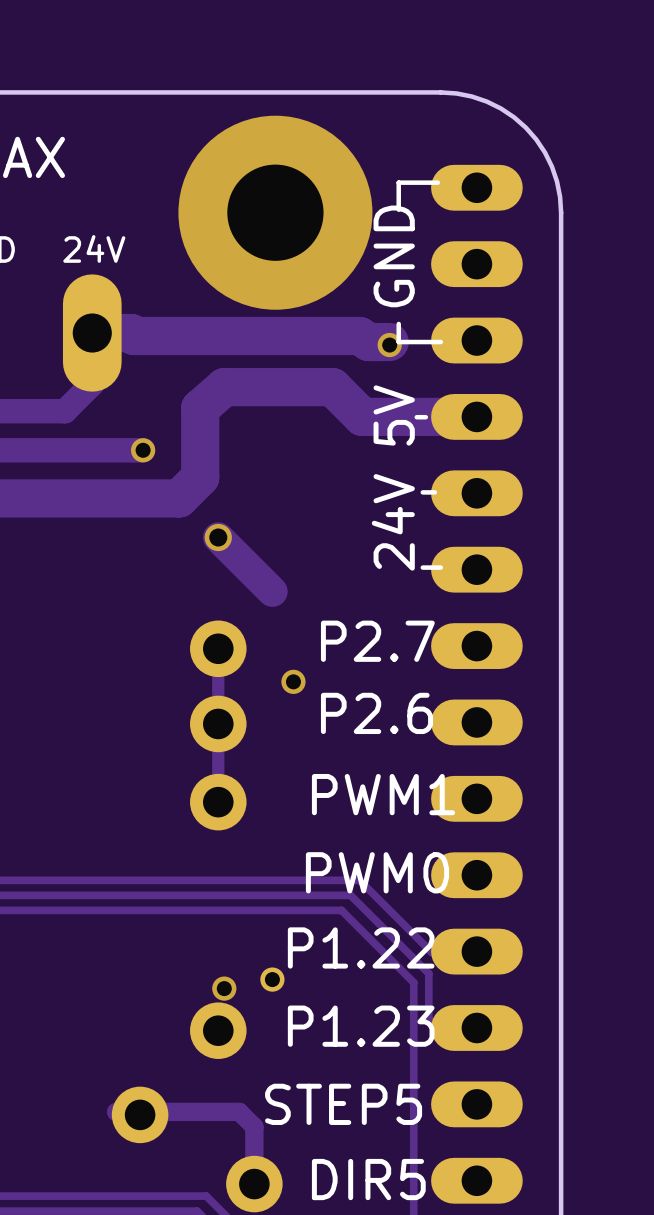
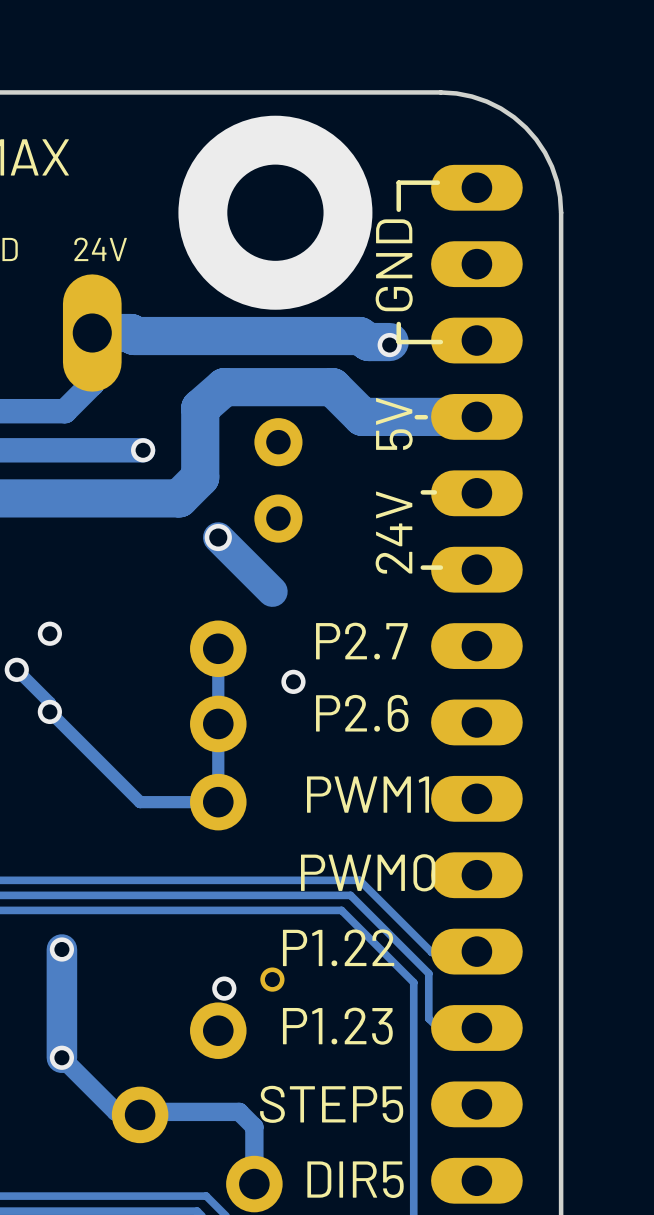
part: none -> (278, 480)
via: none -> (49, 633)
track: none -> (16, 669) (49, 702) (49, 711) (140, 802) (218, 802)
via: none -> (16, 669)
via: none -> (49, 711)
track: none -> (61, 949) (61, 1057) (116, 1111)
via: none -> (61, 949)
via: none -> (61, 1057)

